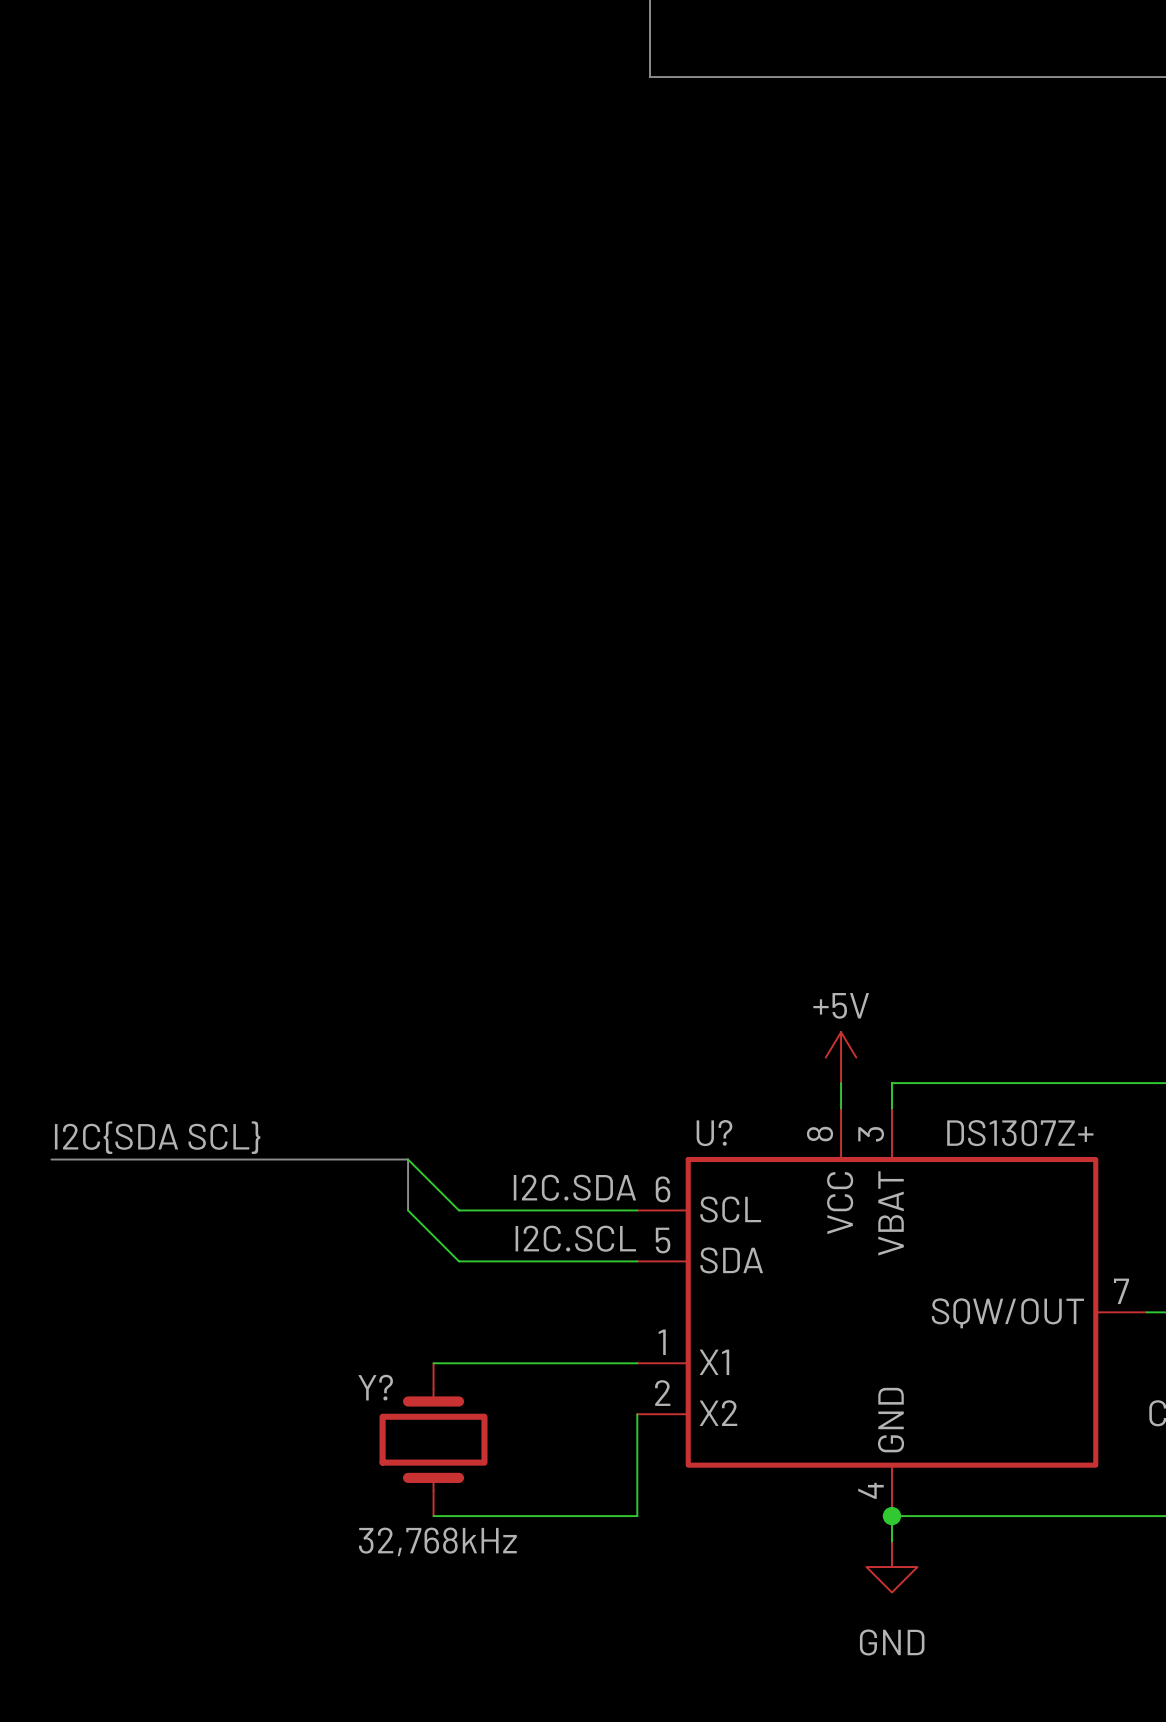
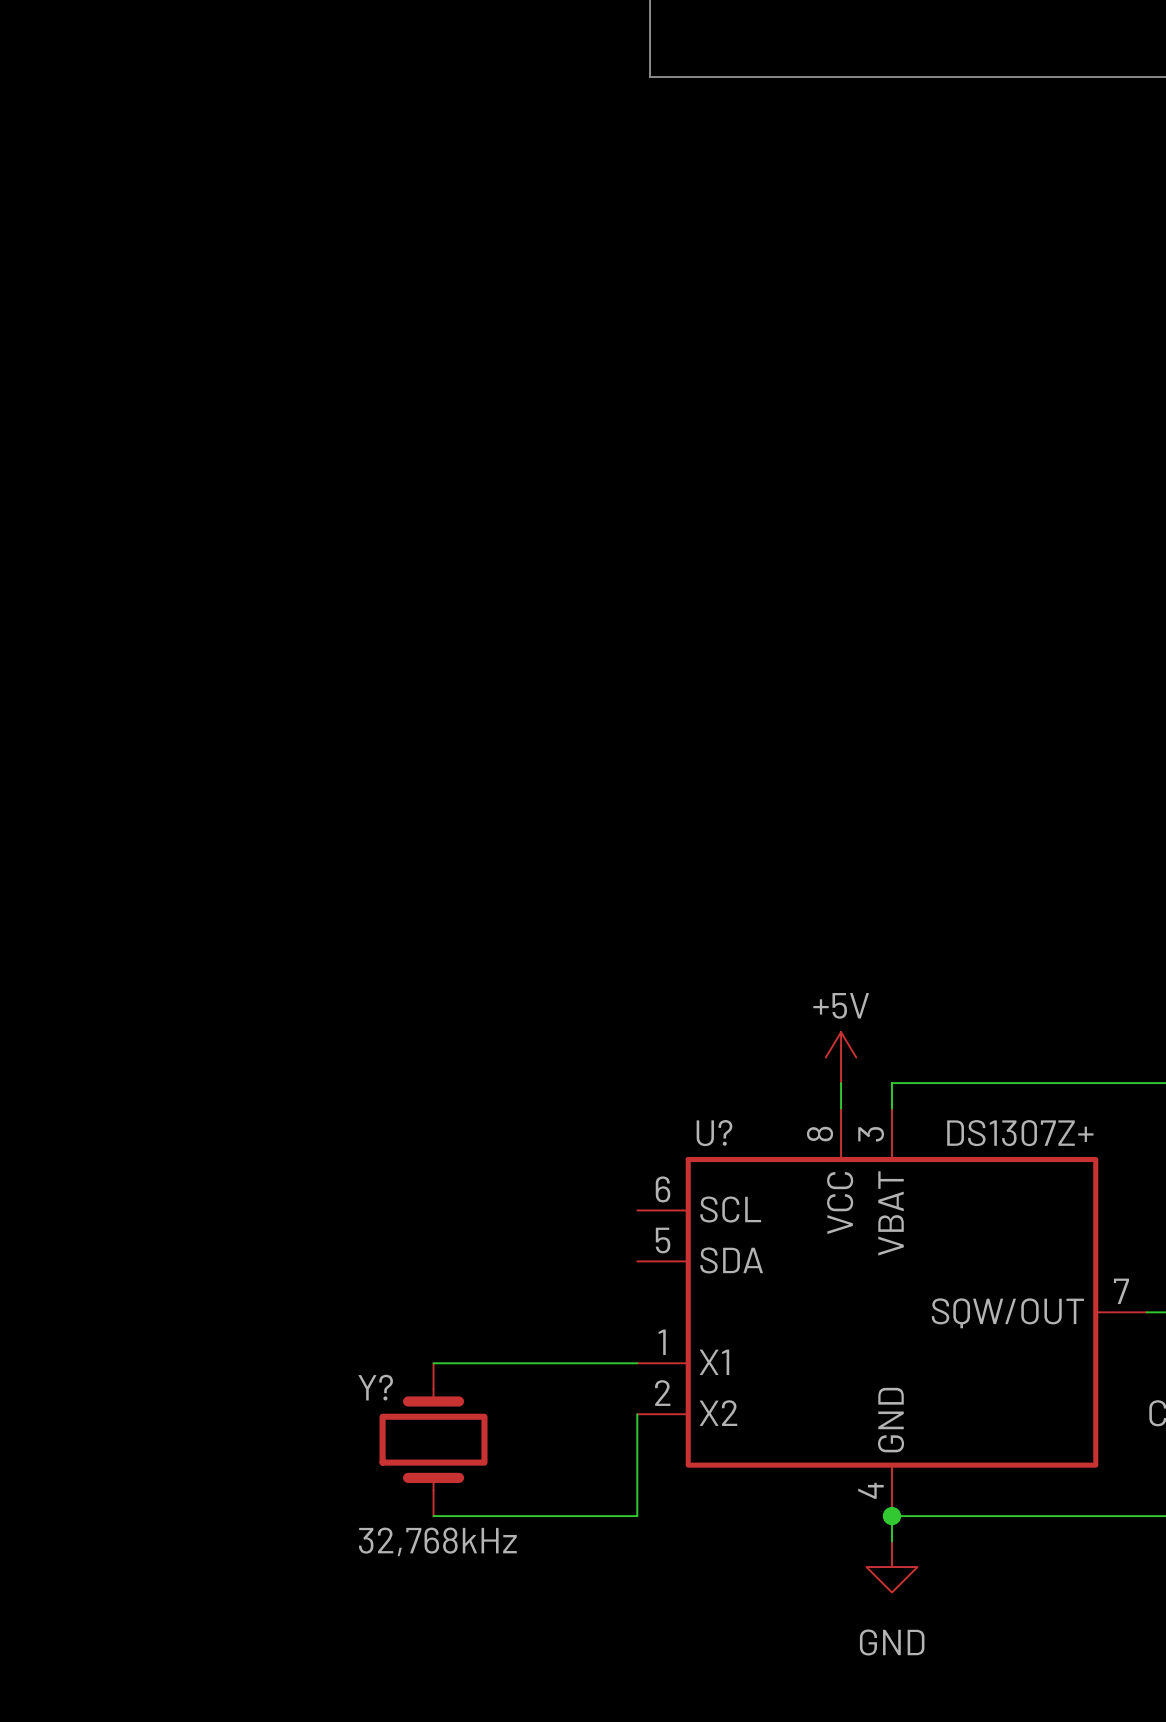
label: I2C{SDA SCL} (157, 1137) -> none
bus: (51, 1159) (408, 1159) (408, 1210) -> none
wire: (408, 1159) (459, 1210) (637, 1210) -> none
label: I2C.SDA (574, 1187) -> none
wire: (408, 1210) (459, 1261) (637, 1261) -> none
label: I2C.SCL (575, 1238) -> none

